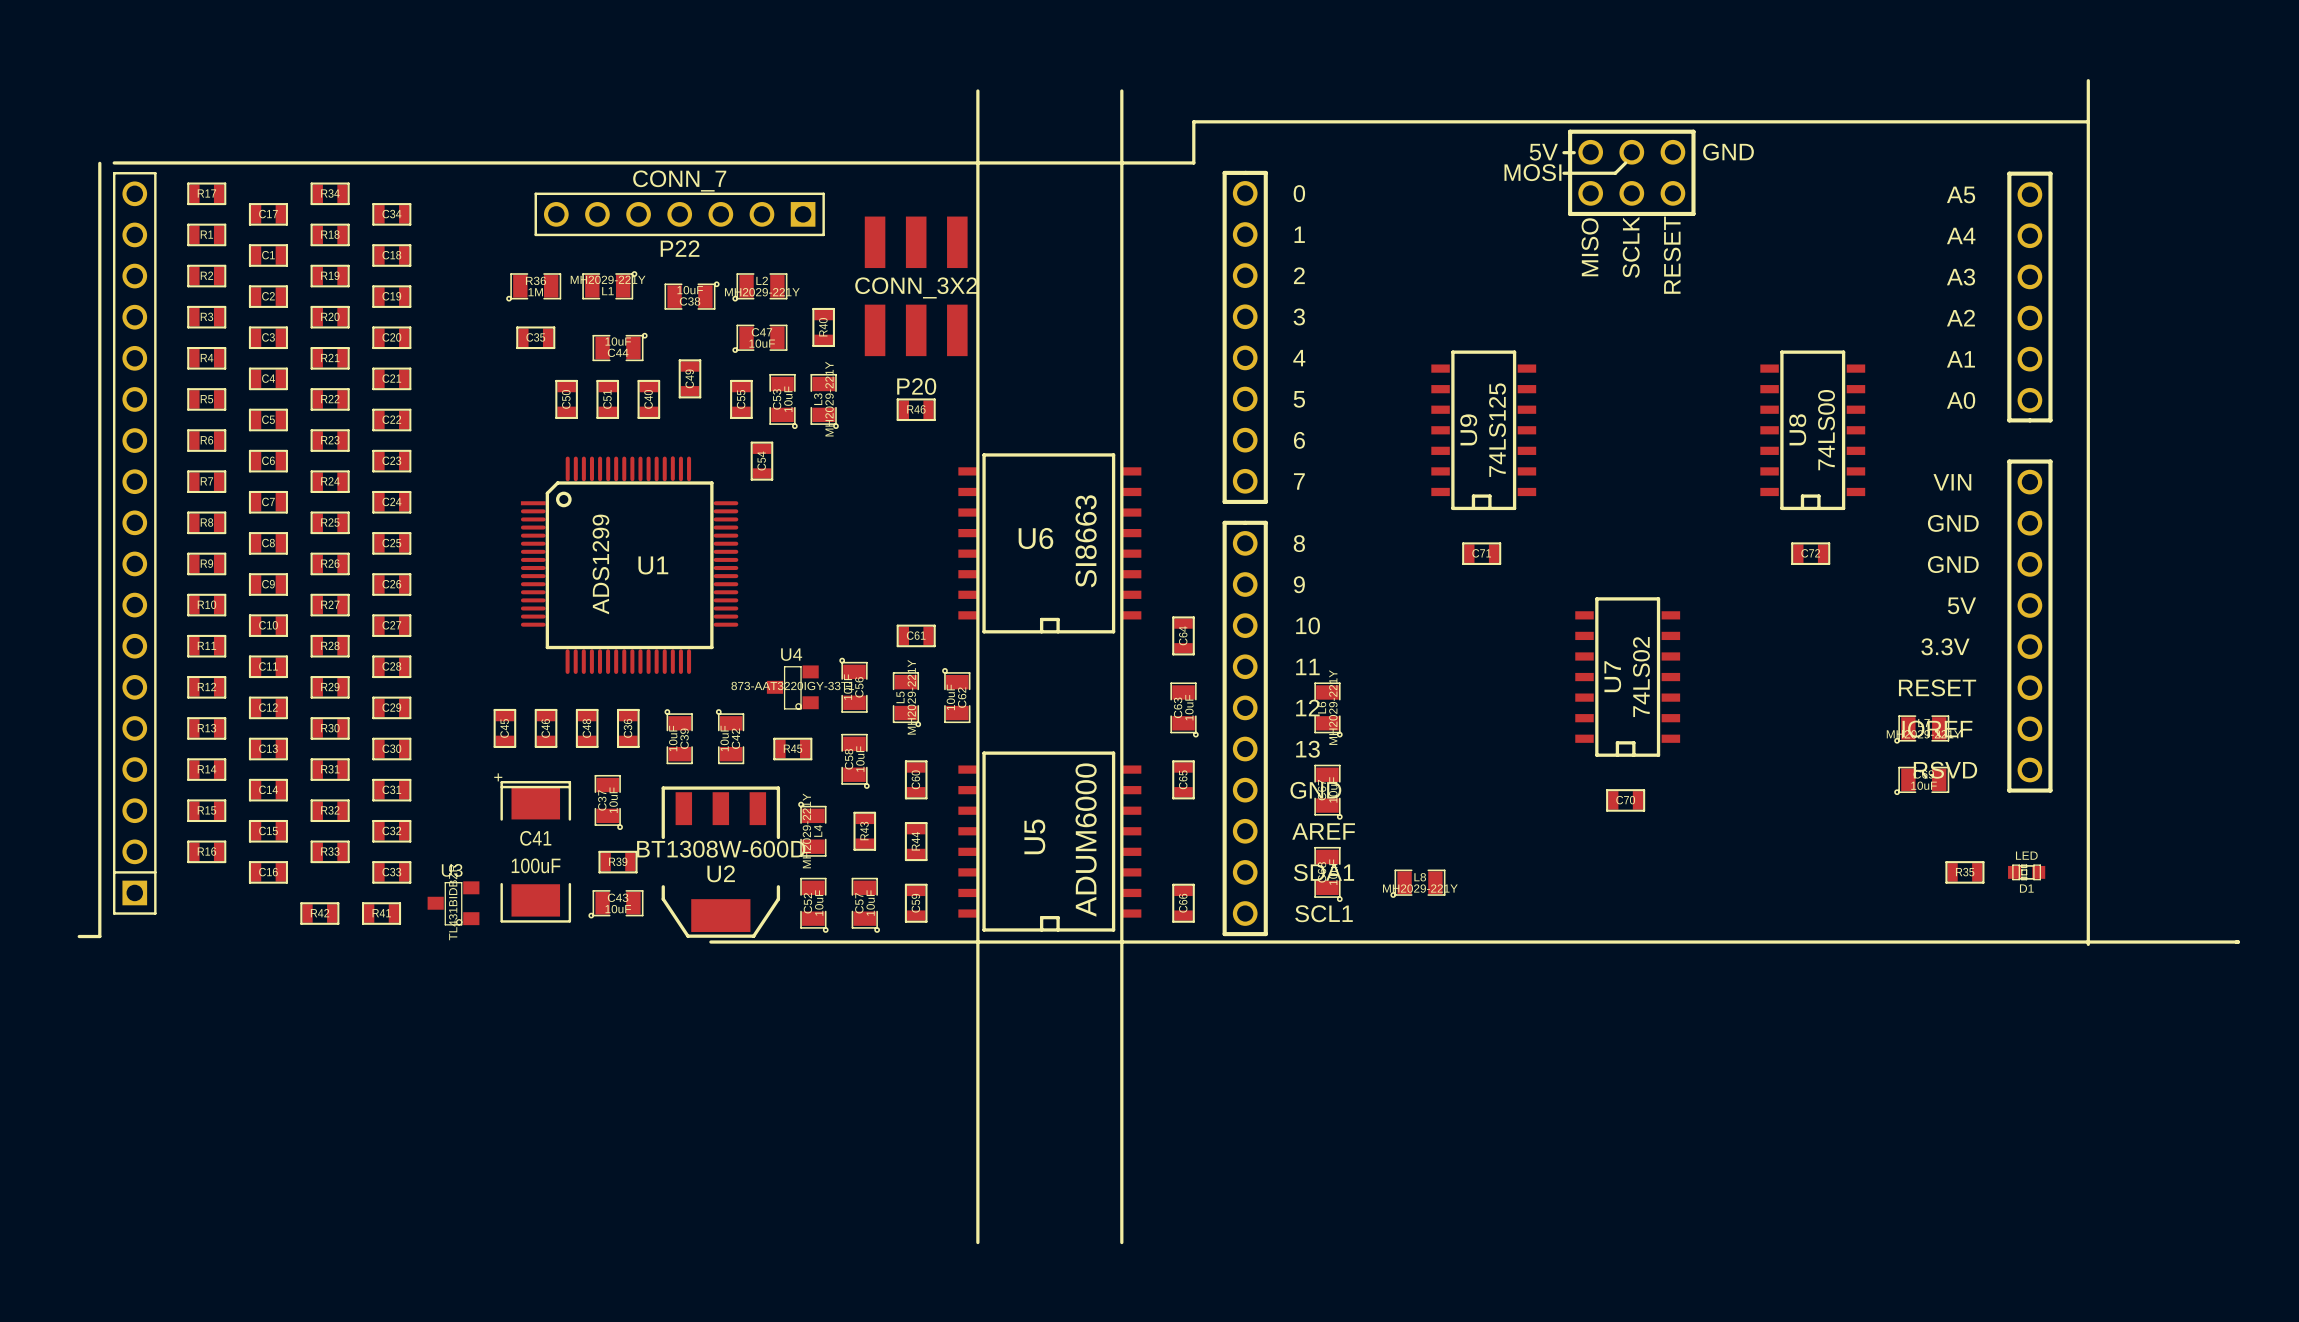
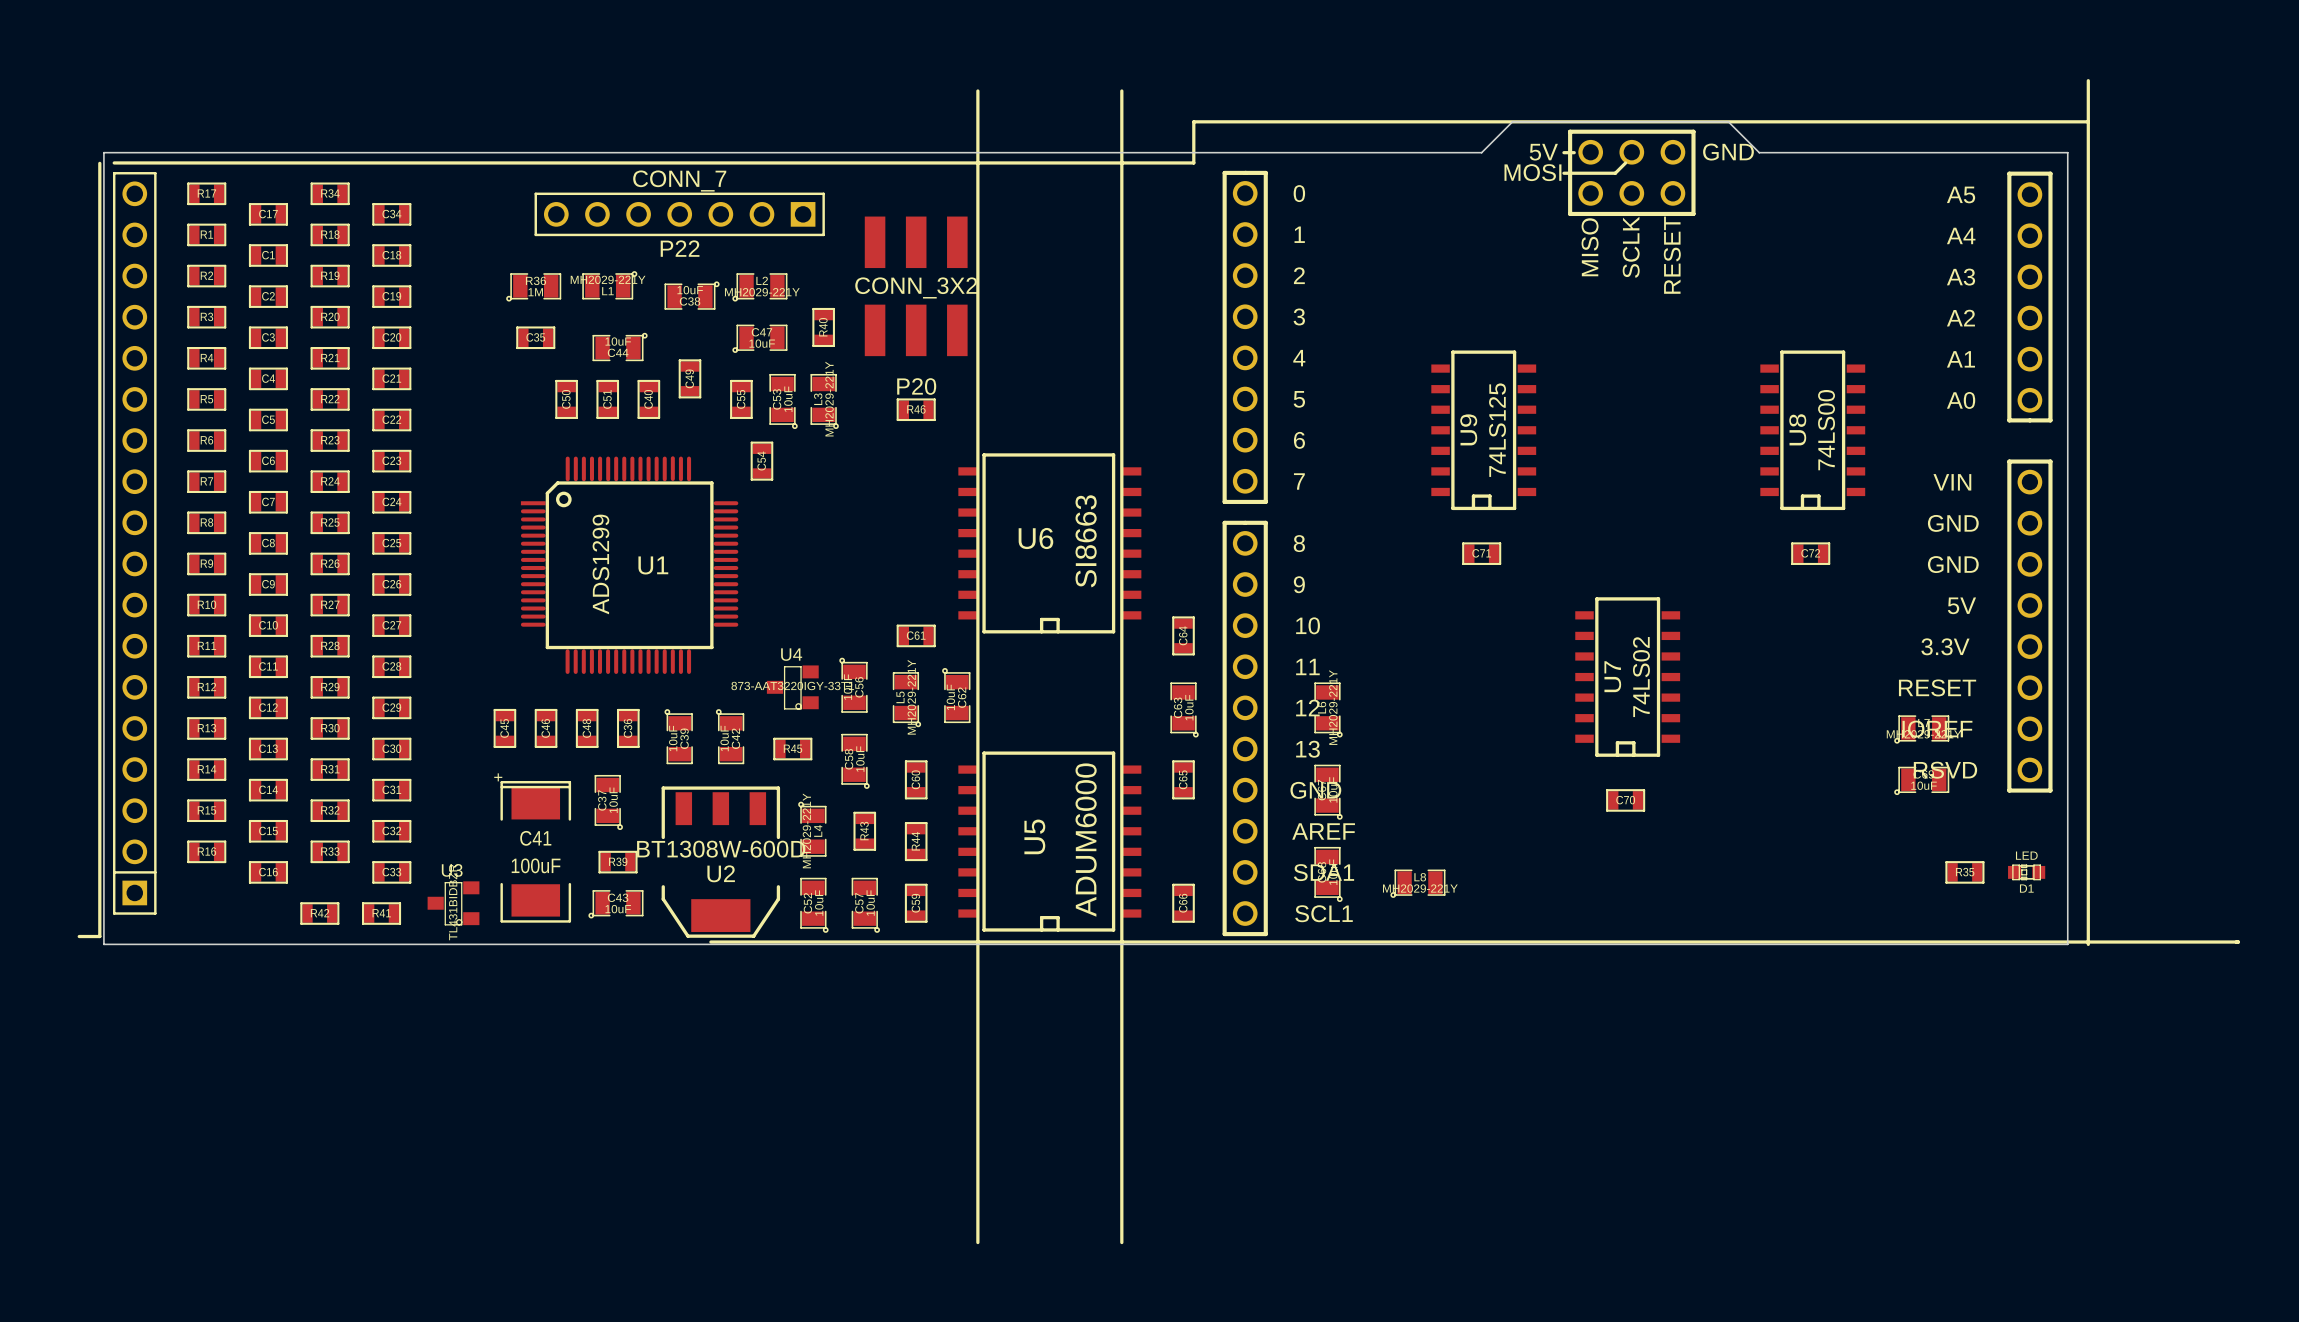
board edge: none -> (1512, 121) (1481, 152) (103, 152) (103, 944) (2067, 944) (2067, 152) (1759, 152) (1728, 121) (1512, 121)

